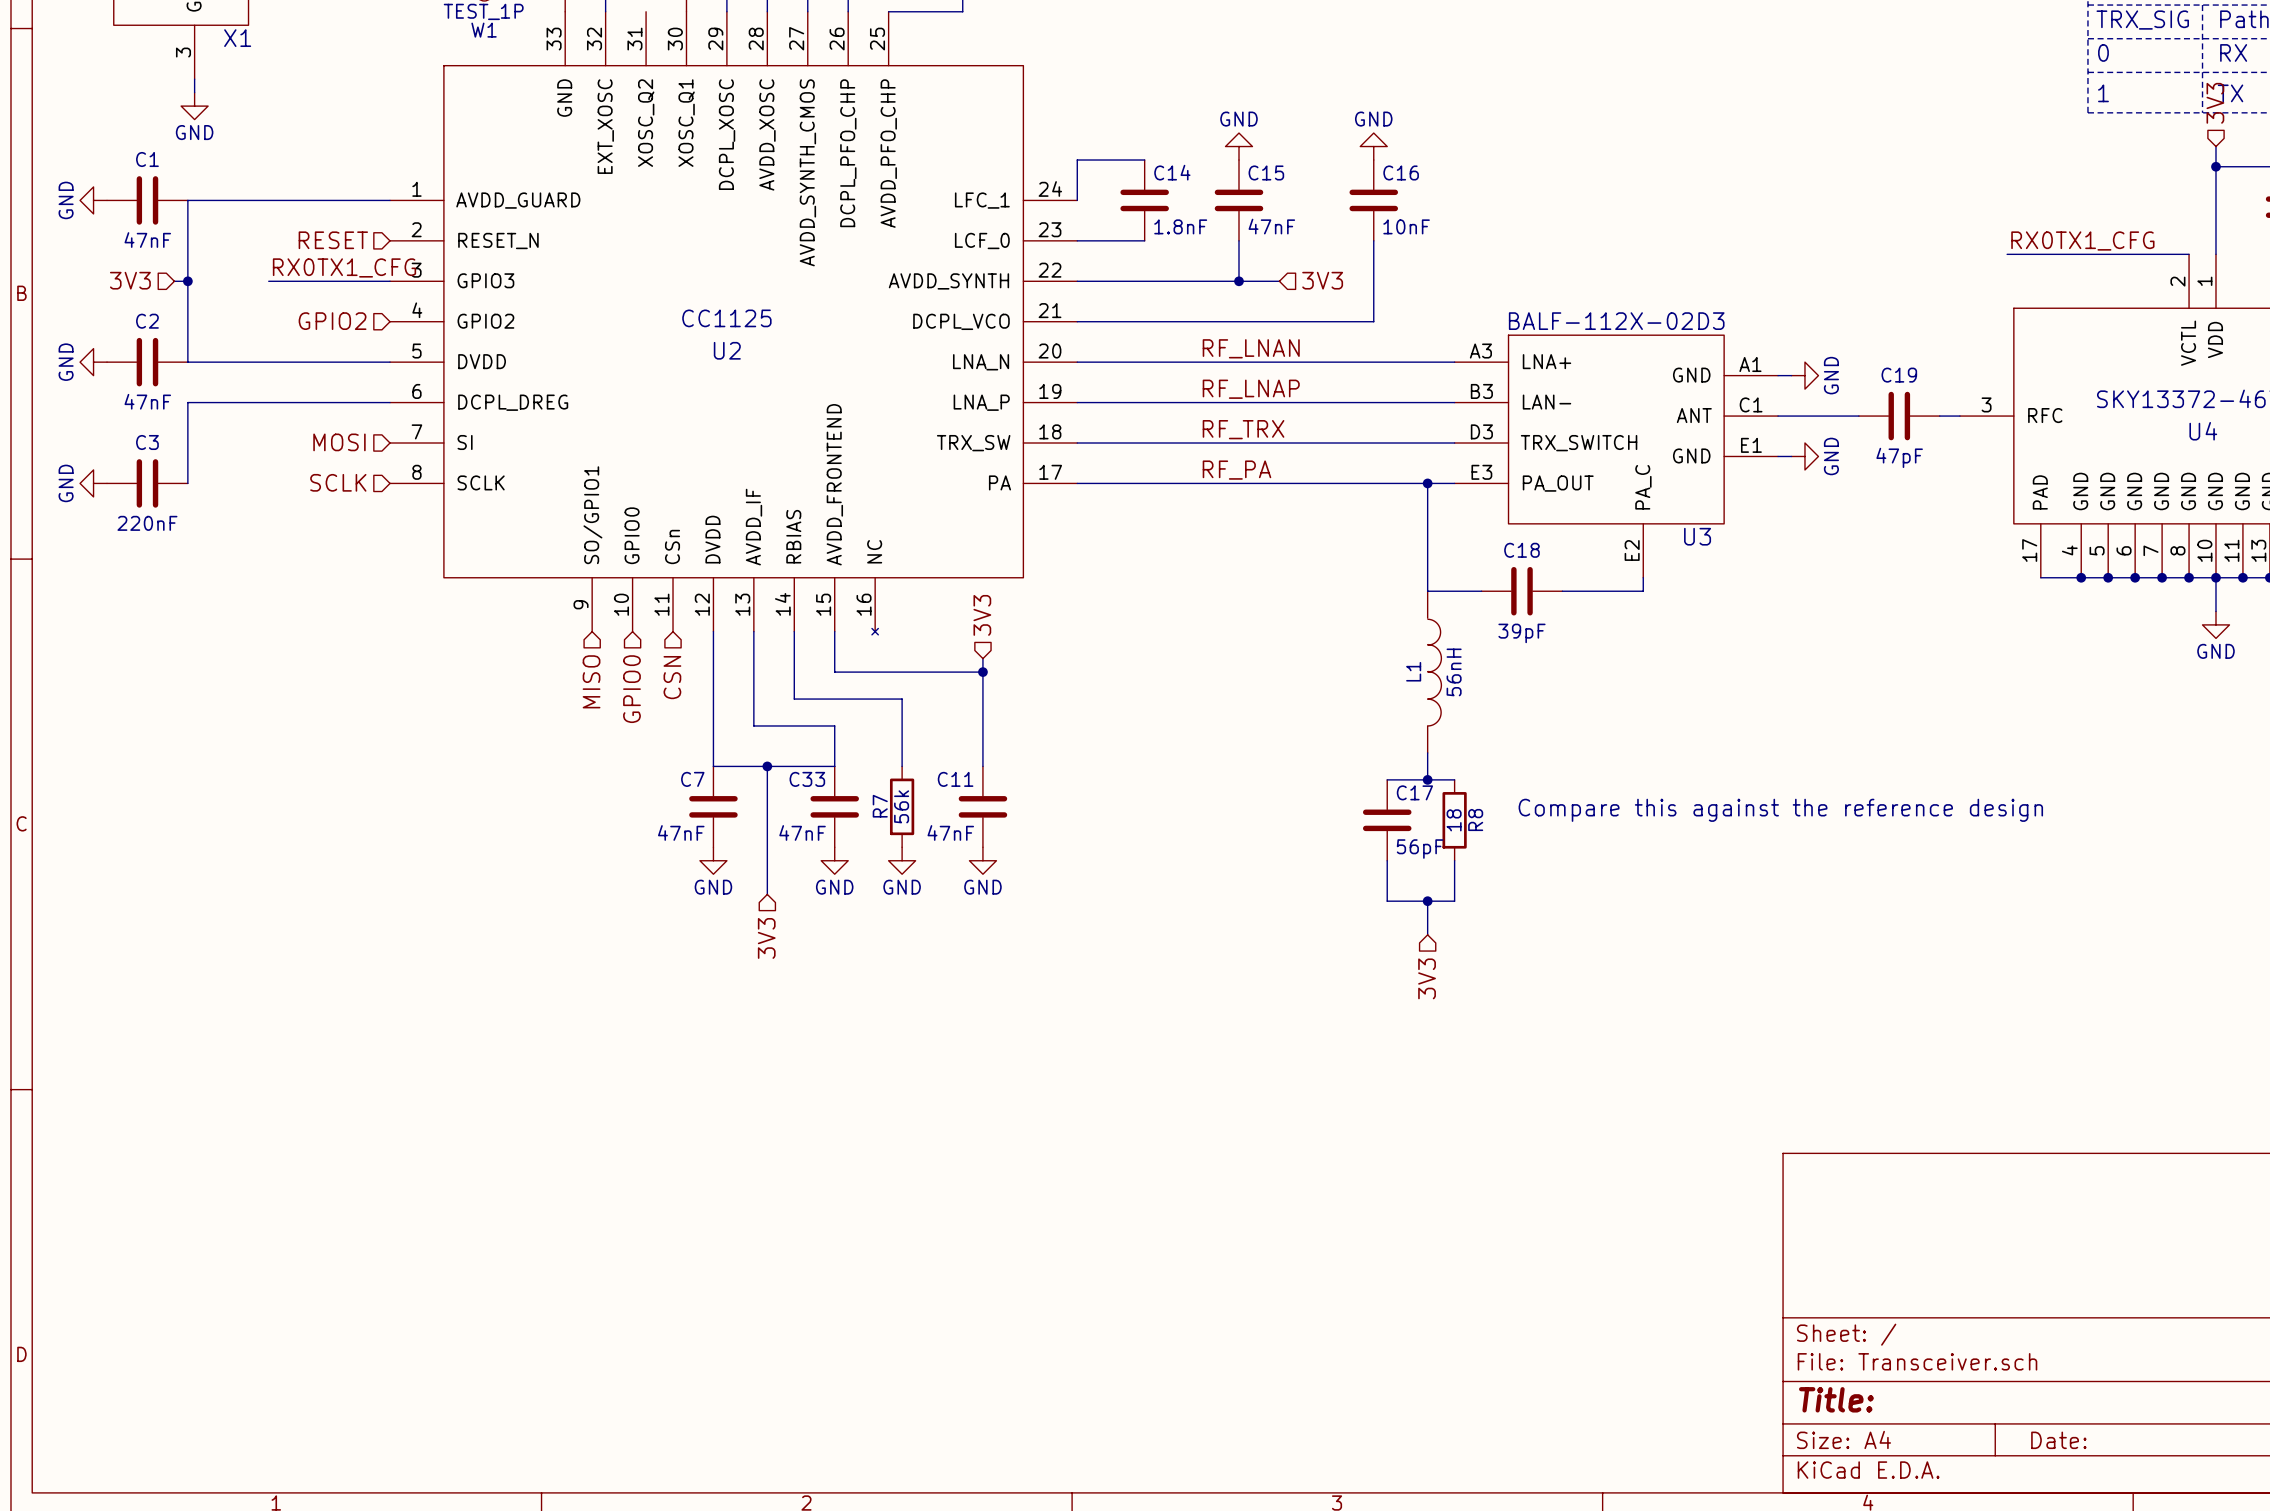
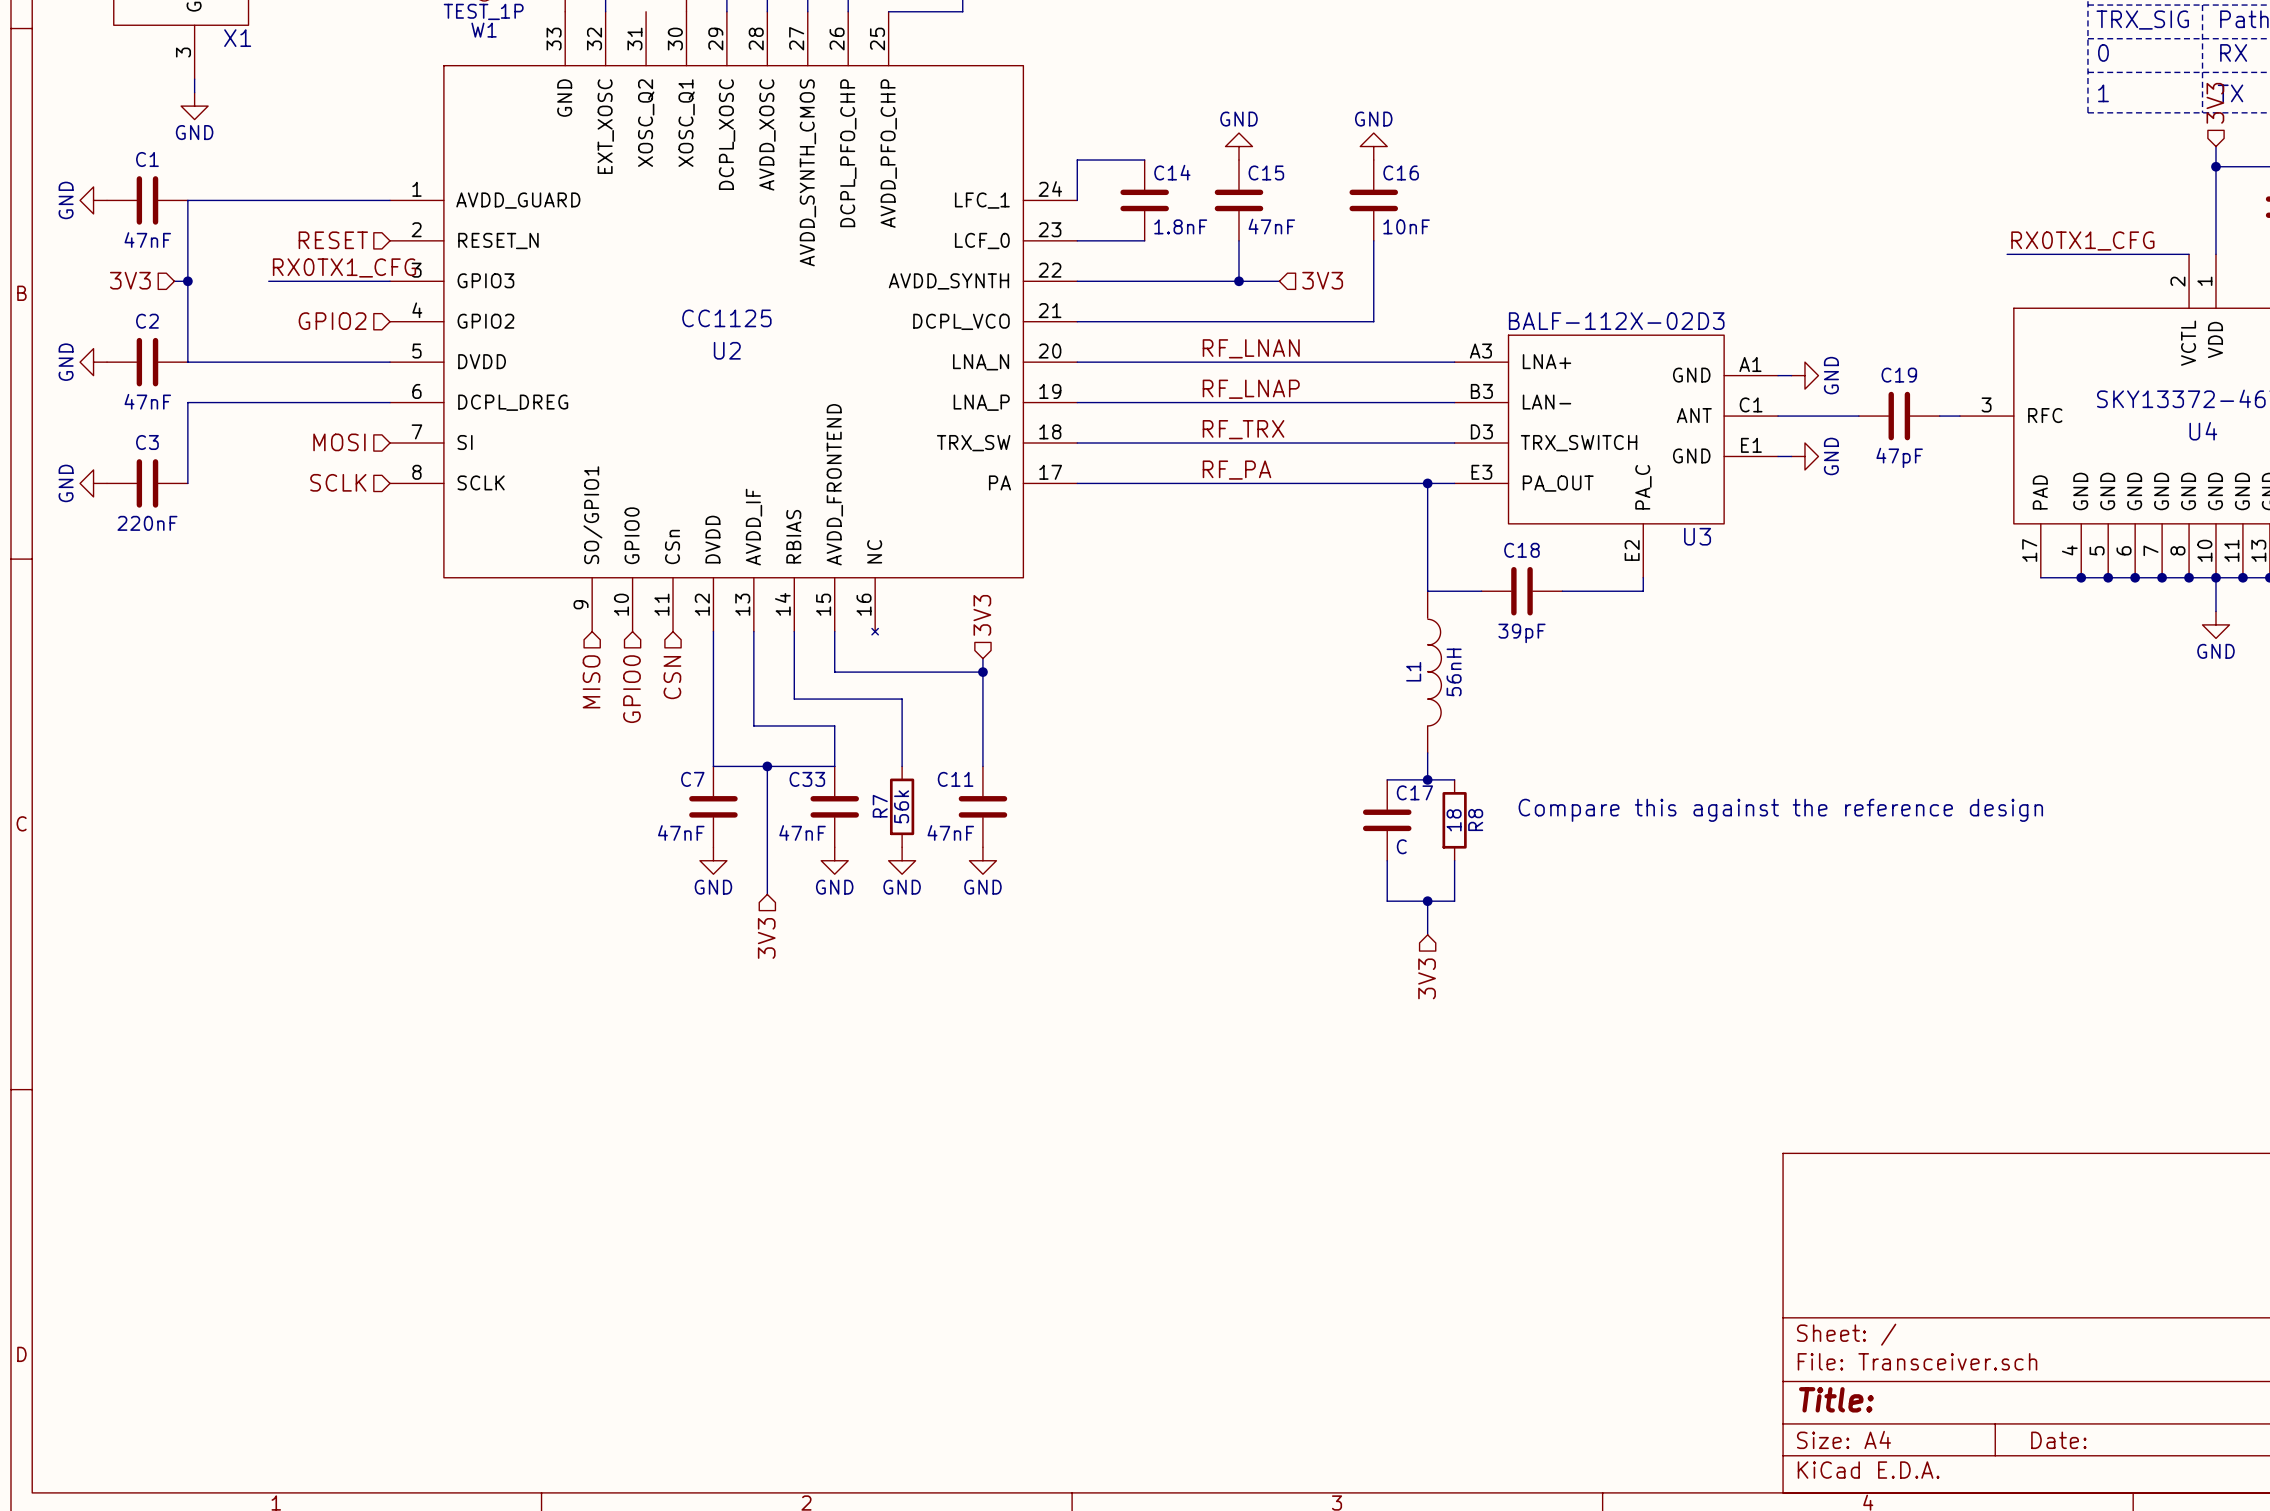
C17 value: 56pF (1420, 849) -> C (1401, 846)

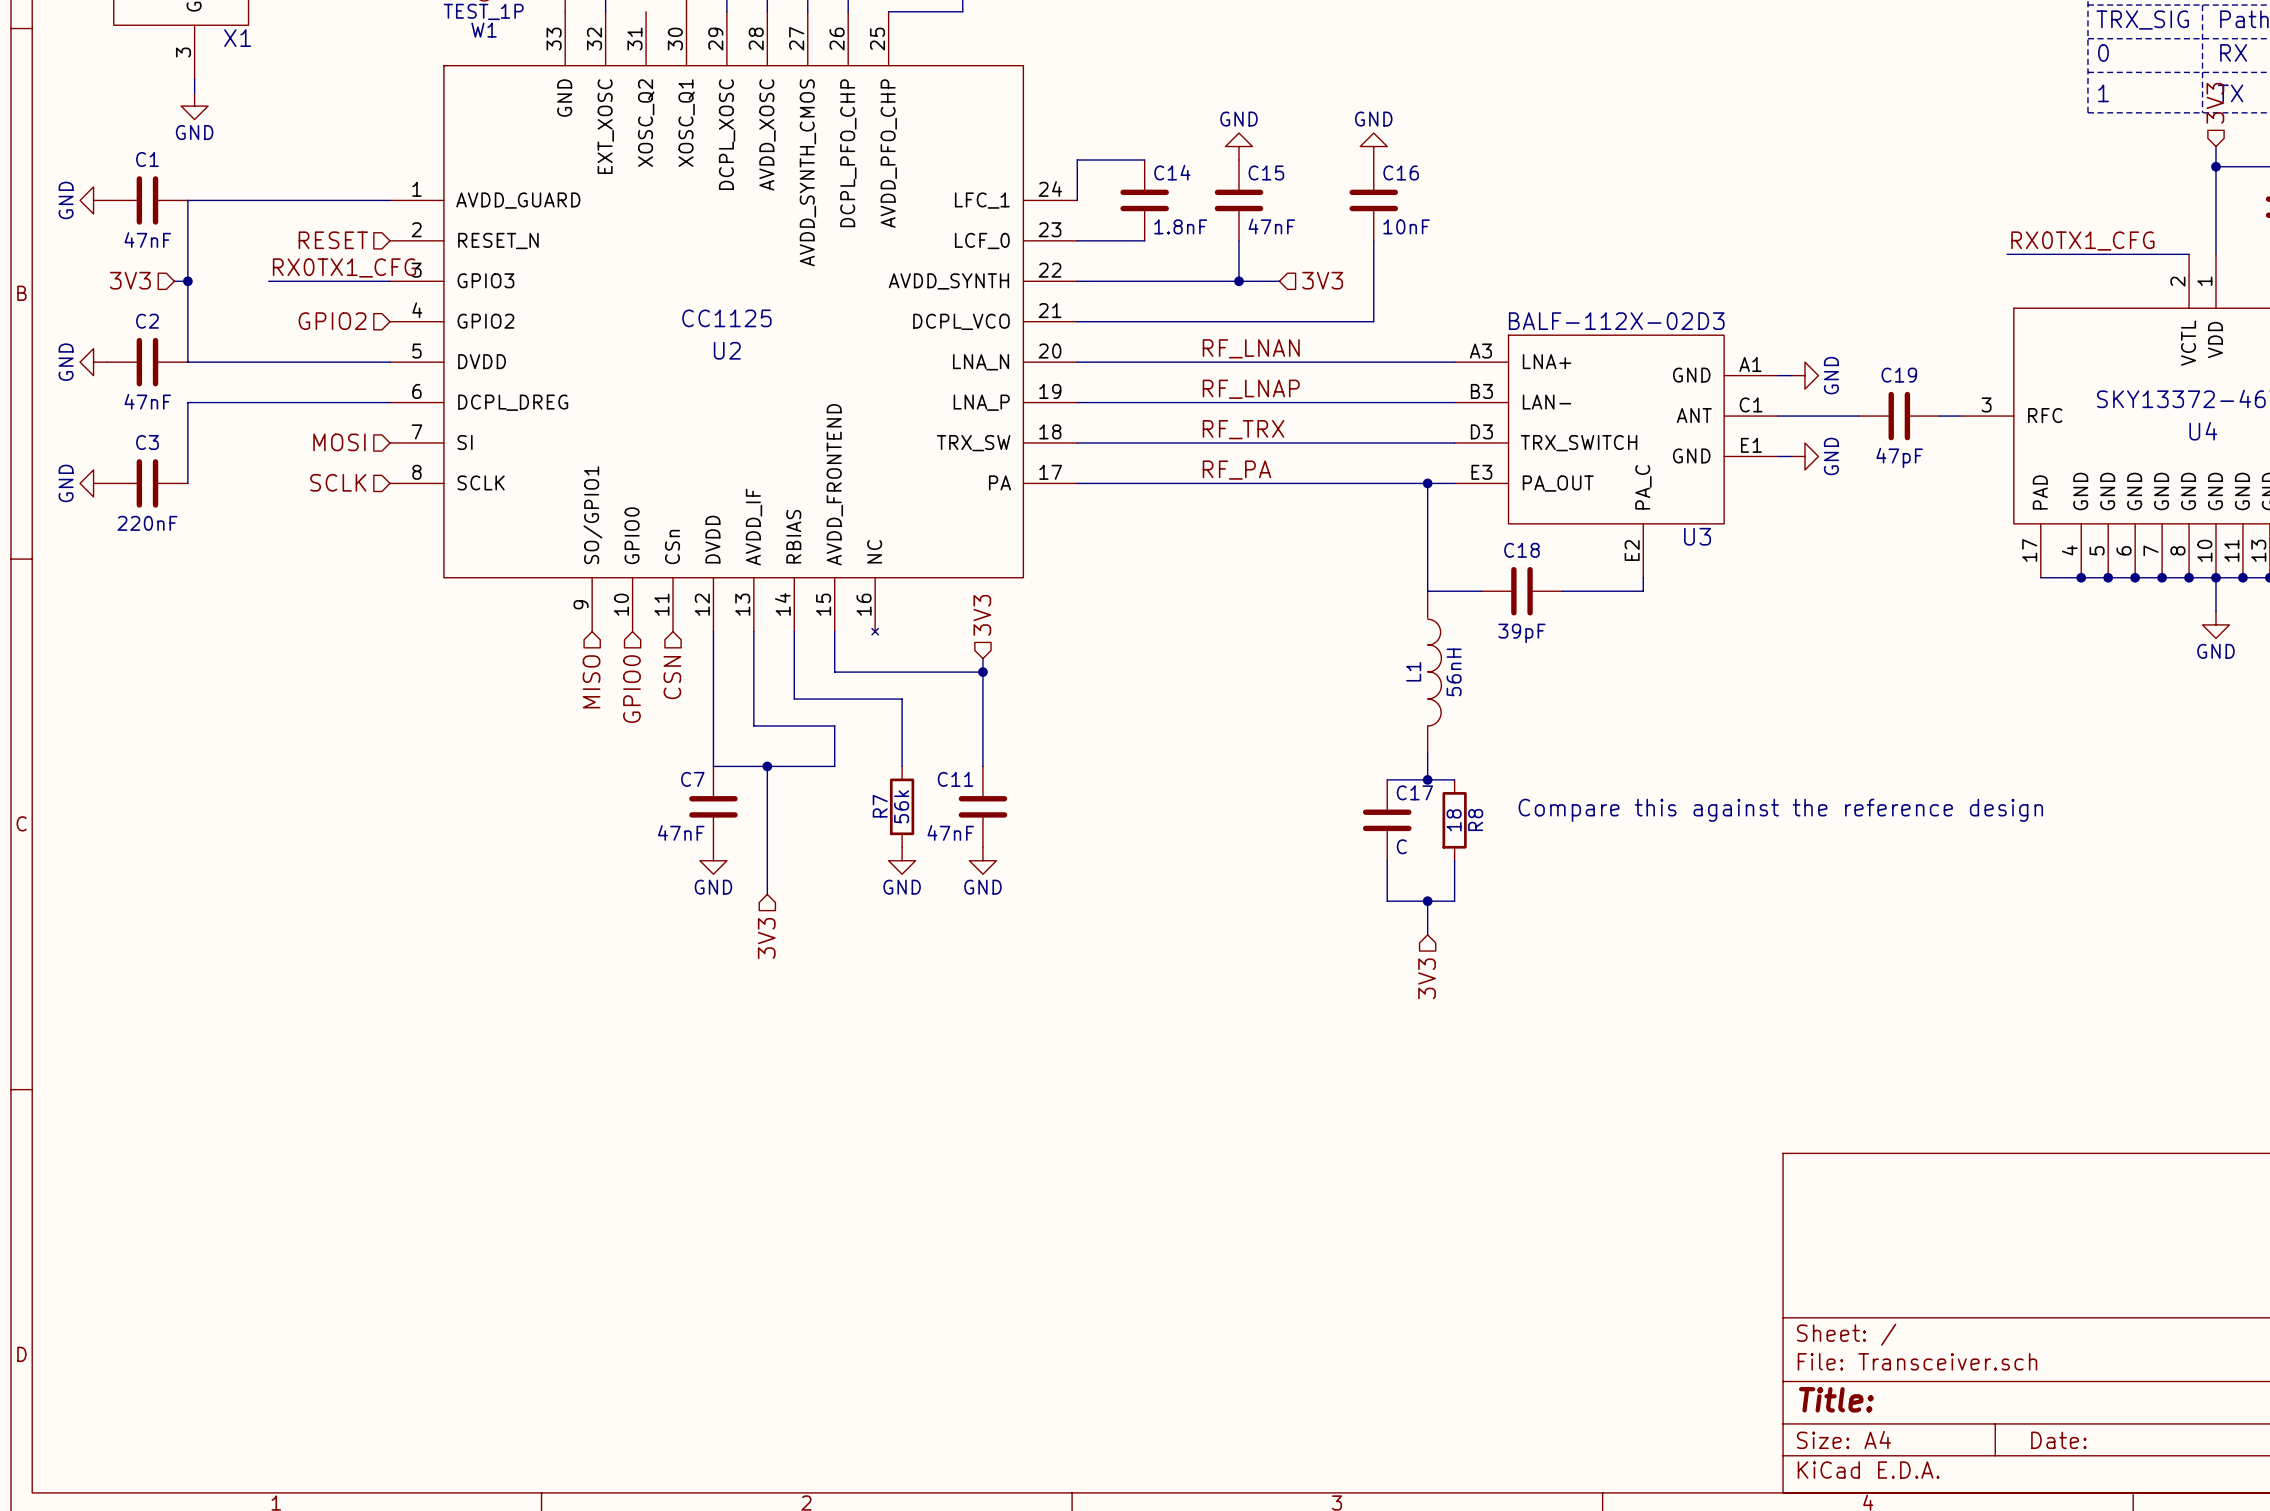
C33: 47nF (834, 806) -> none
power symbol: GND (834, 860) -> none

